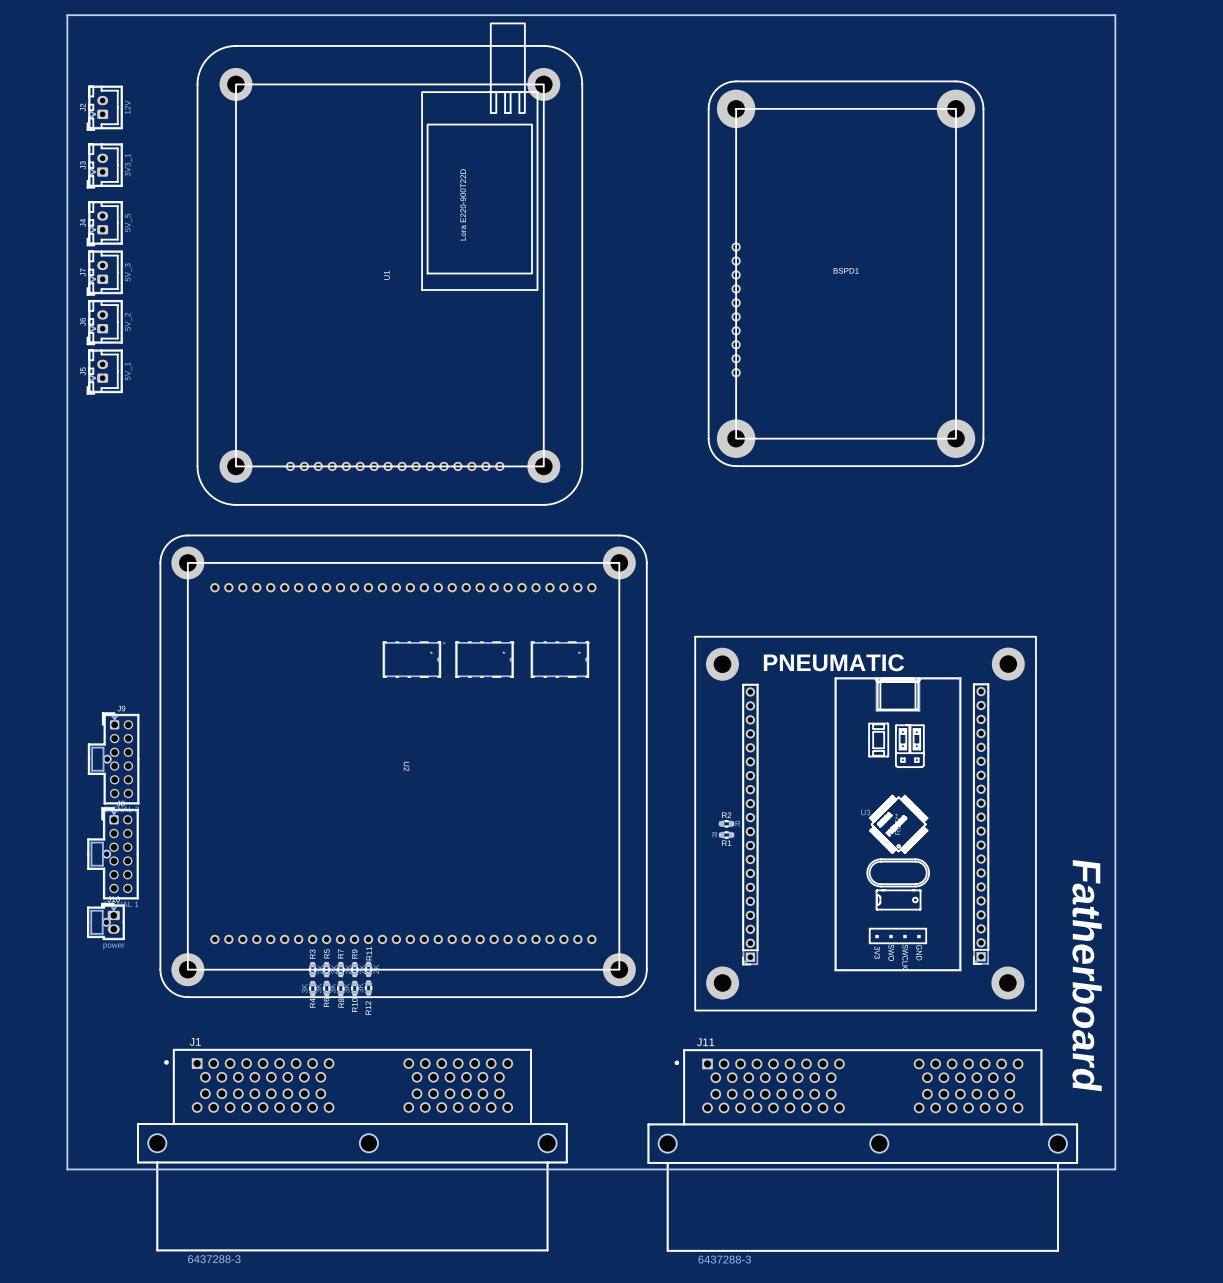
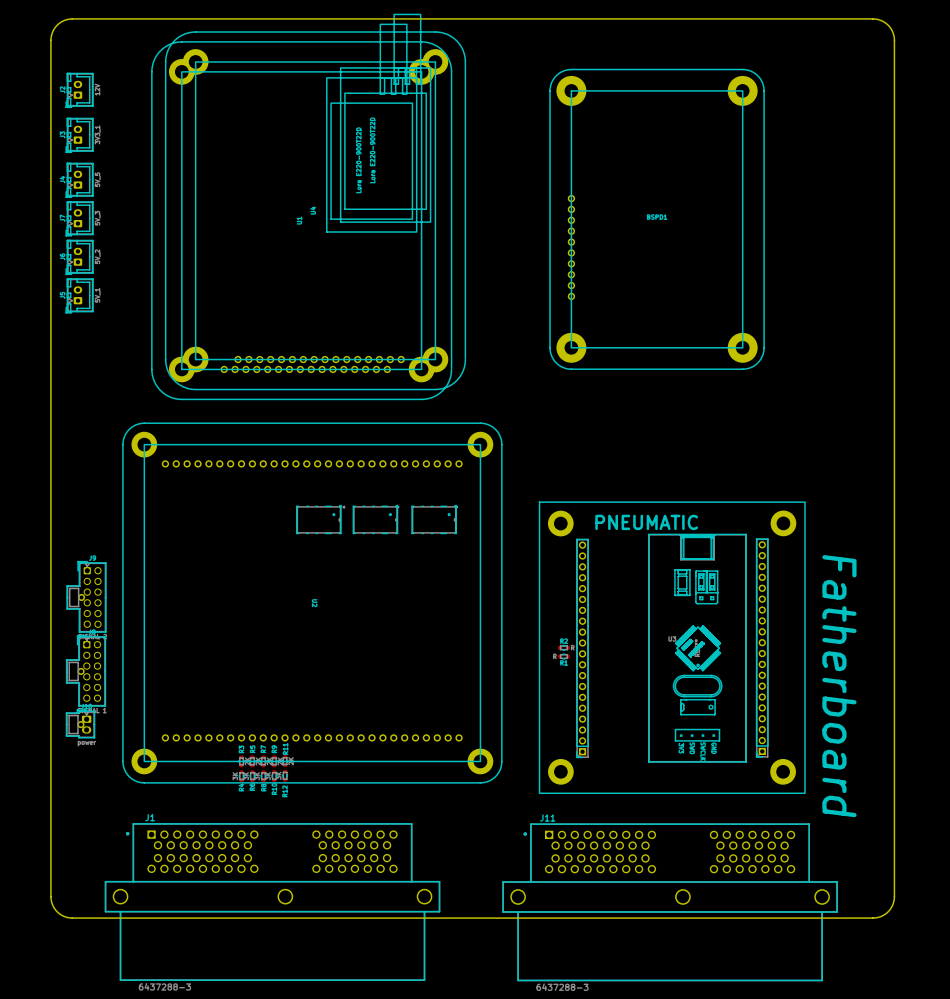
board edge: (67, 15) (1115, 15) (1115, 1169) (67, 1169) (67, 15) -> (72, 18) (65, 20) (57, 25) (52, 33) (50, 40) (50, 896) (52, 903) (57, 911) (65, 916) (72, 918) (873, 918) (882, 915) (888, 911) (892, 905) (894, 896) (894, 40) (892, 31) (888, 25) (882, 21) (873, 18) (72, 18)
part: none -> (315, 201)
text: none -> Fatherboard (839, 686)
text: Fatherboard (1087, 975) -> none

